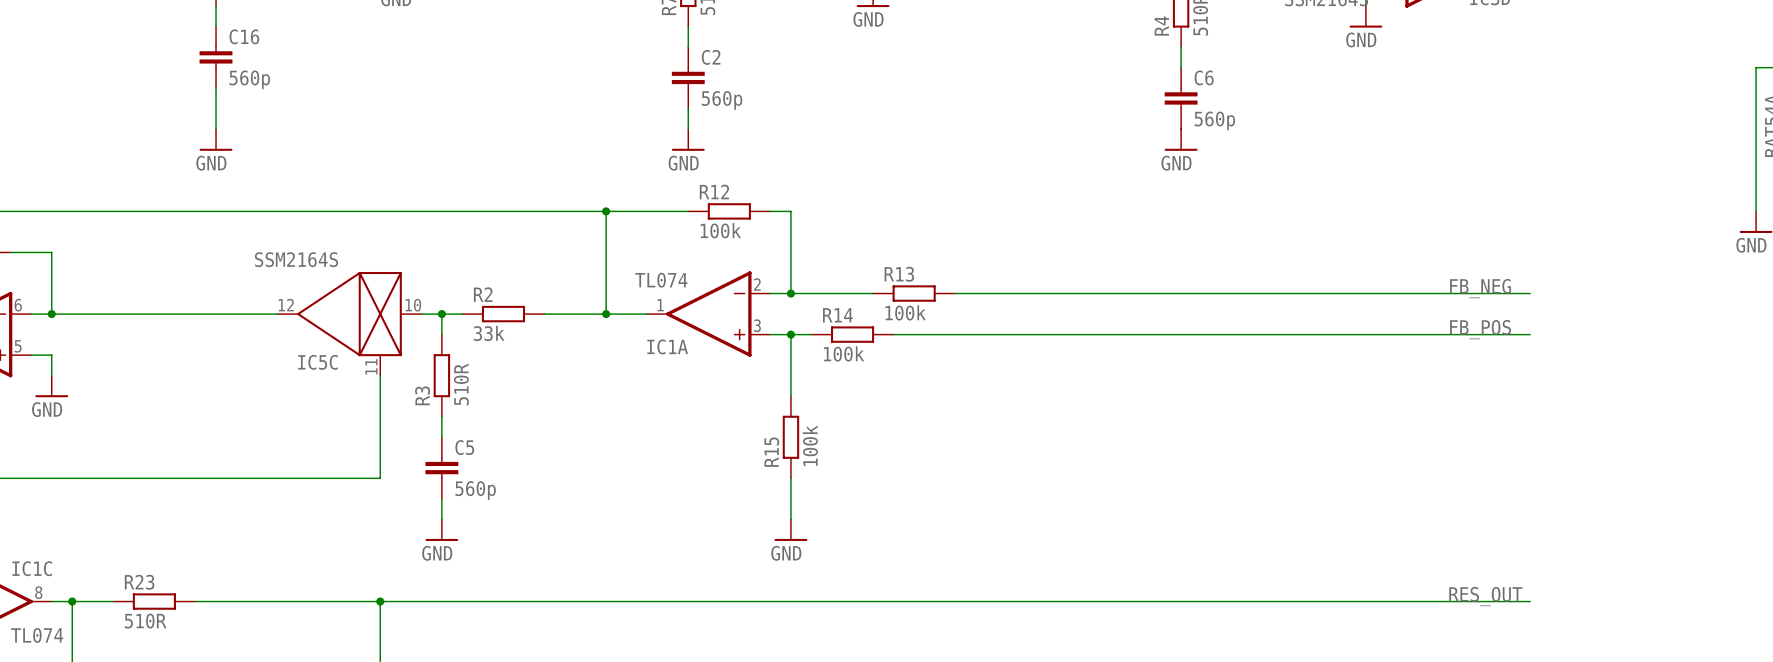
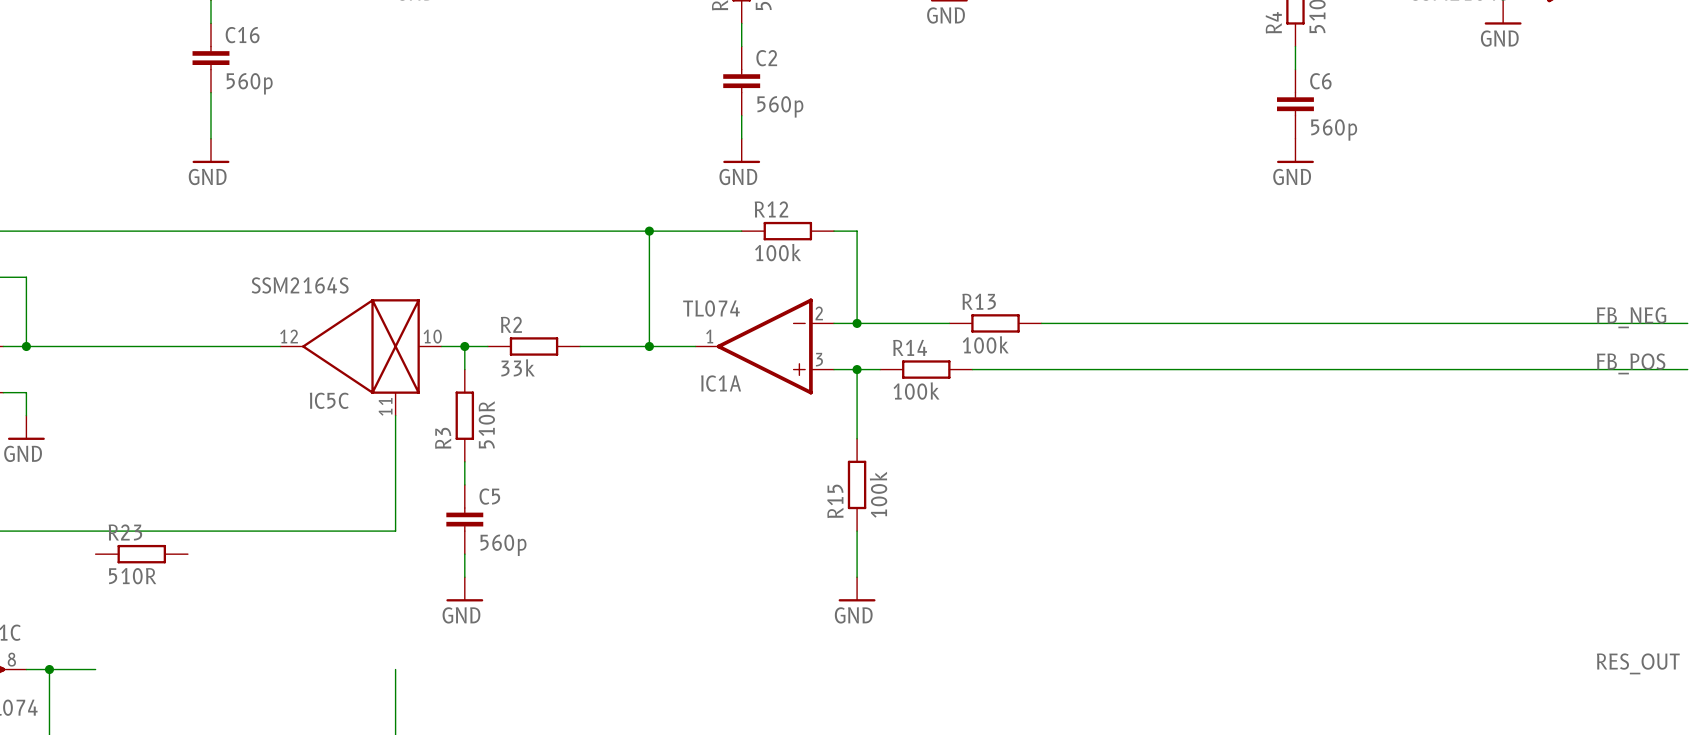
R23 position: (154, 601) -> (141, 554)
wire: (195, 601) (1530, 601) -> none
junction: (380, 601) -> none

